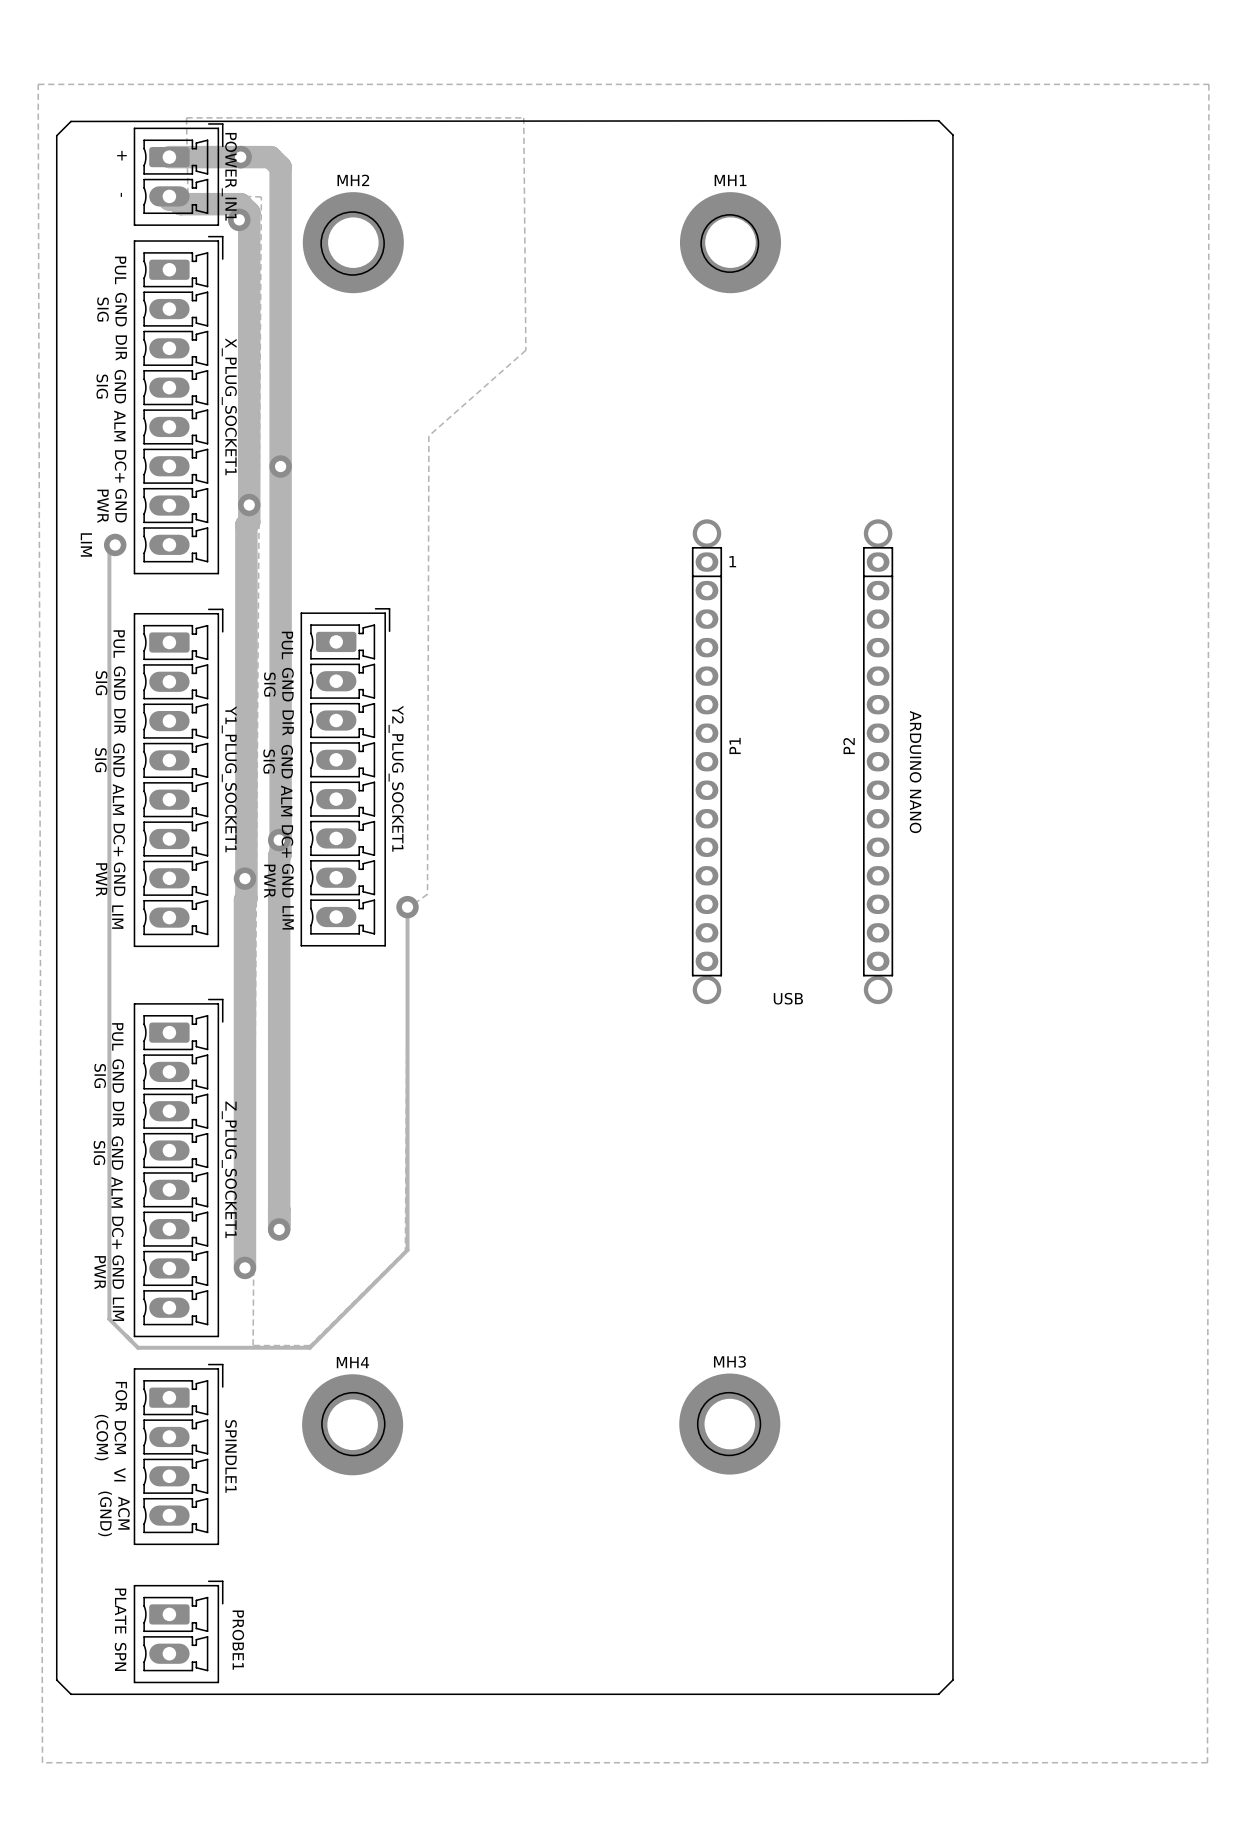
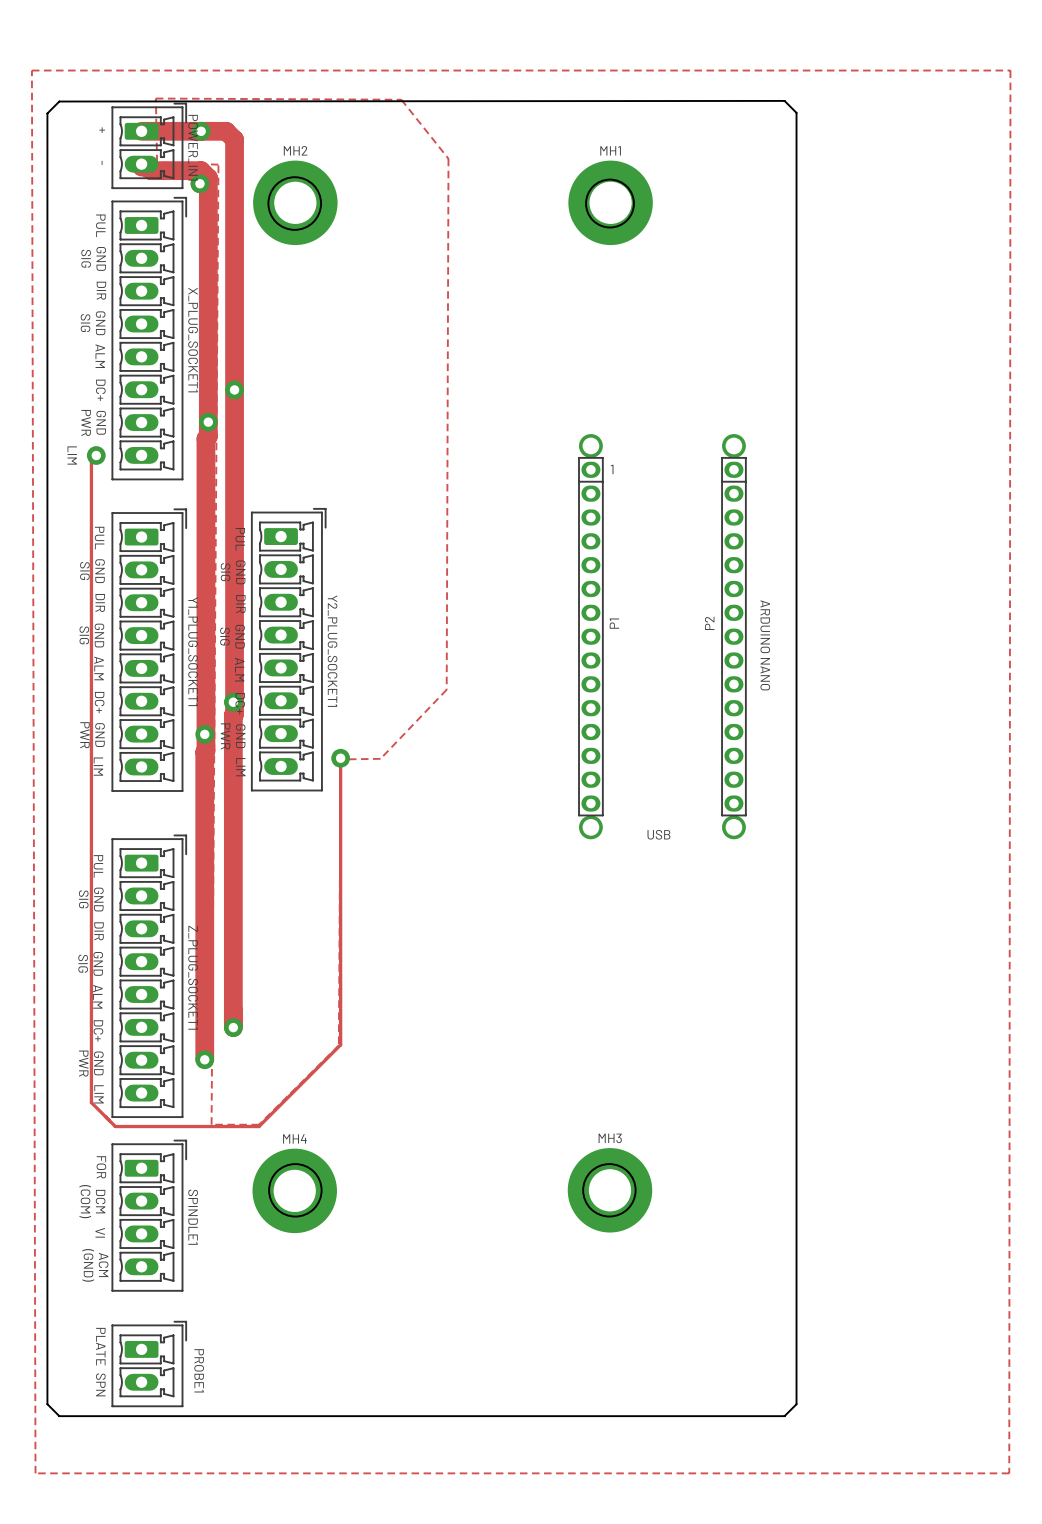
zone outline: (186, 117) (523, 117) (525, 350) (428, 435) (427, 894) (407, 908) -> (155, 98) (401, 99) (448, 158) (446, 689) (380, 758) (340, 759)

